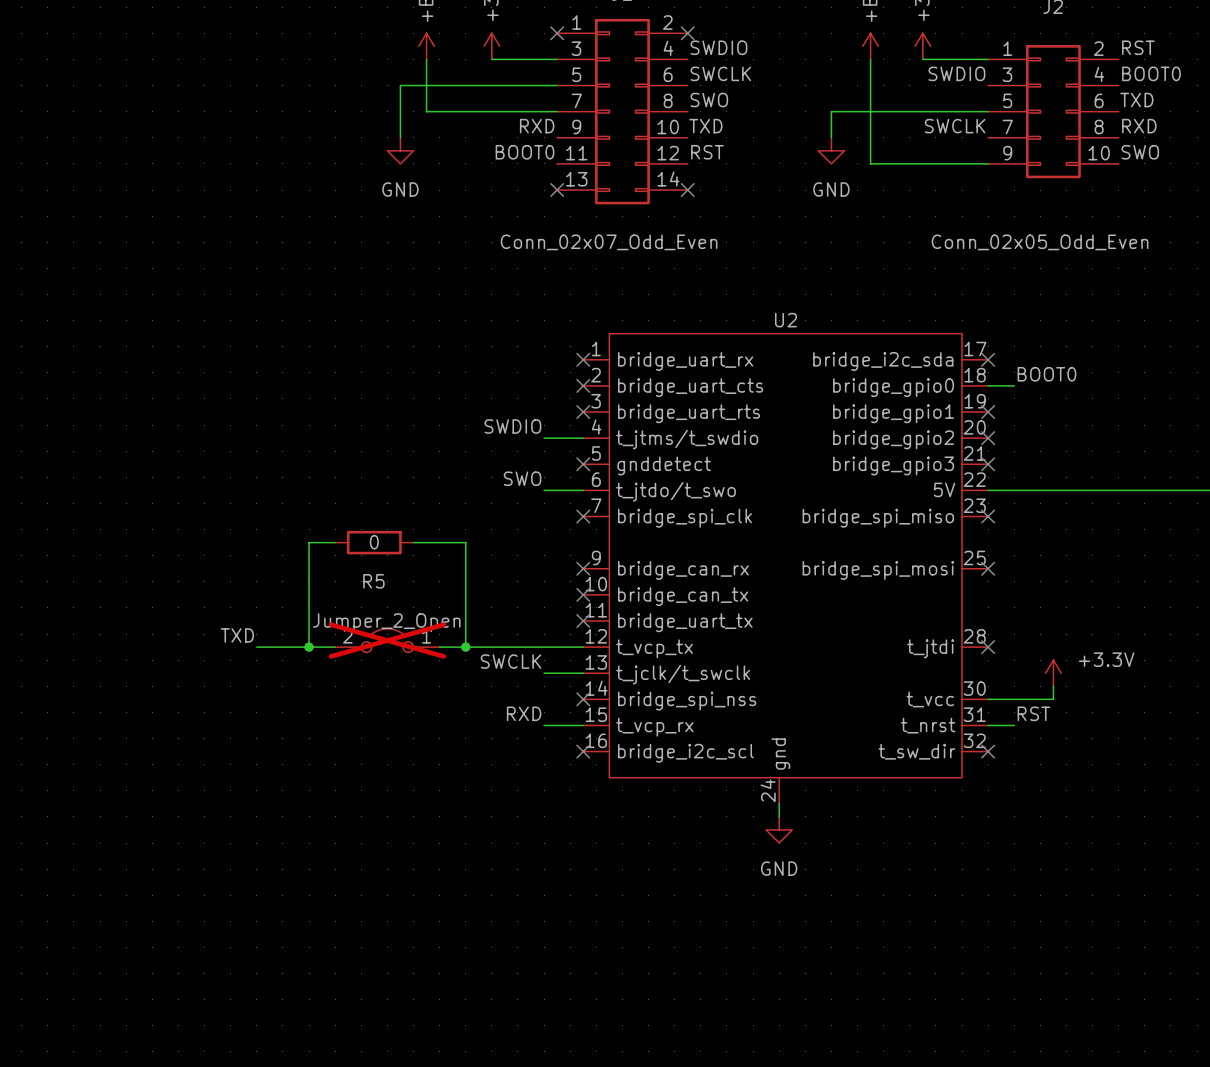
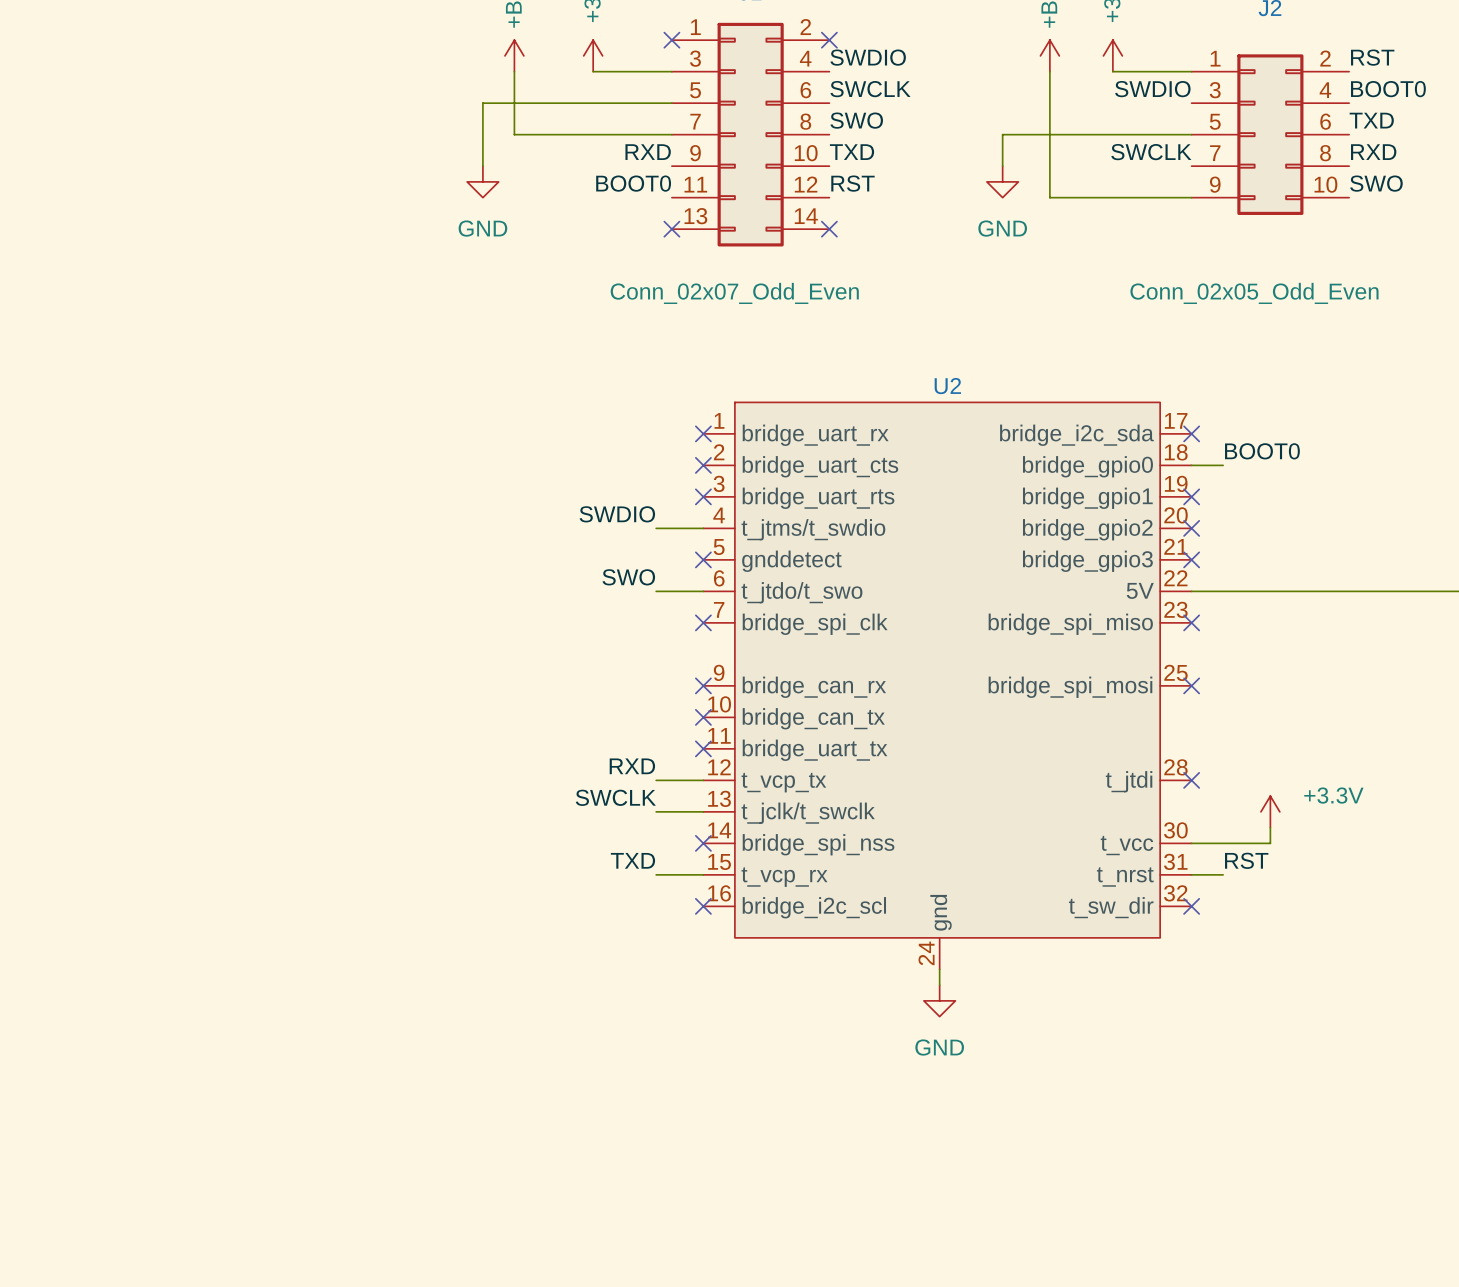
wire: (335, 542) (309, 542) (309, 647) -> none
R5: 0 (374, 542) -> none
wire: (413, 542) (465, 542) (465, 647) -> none
label: TXD (237, 635) -> none
label: none -> RXD (632, 766)
part: Jumper_2_Open (387, 640) -> none
wire: (256, 647) (335, 647) -> none
junction: (309, 647) -> none
wire: (439, 647) (544, 647) -> none
junction: (465, 647) -> none
label: RXD (524, 713) -> TXD (632, 860)

